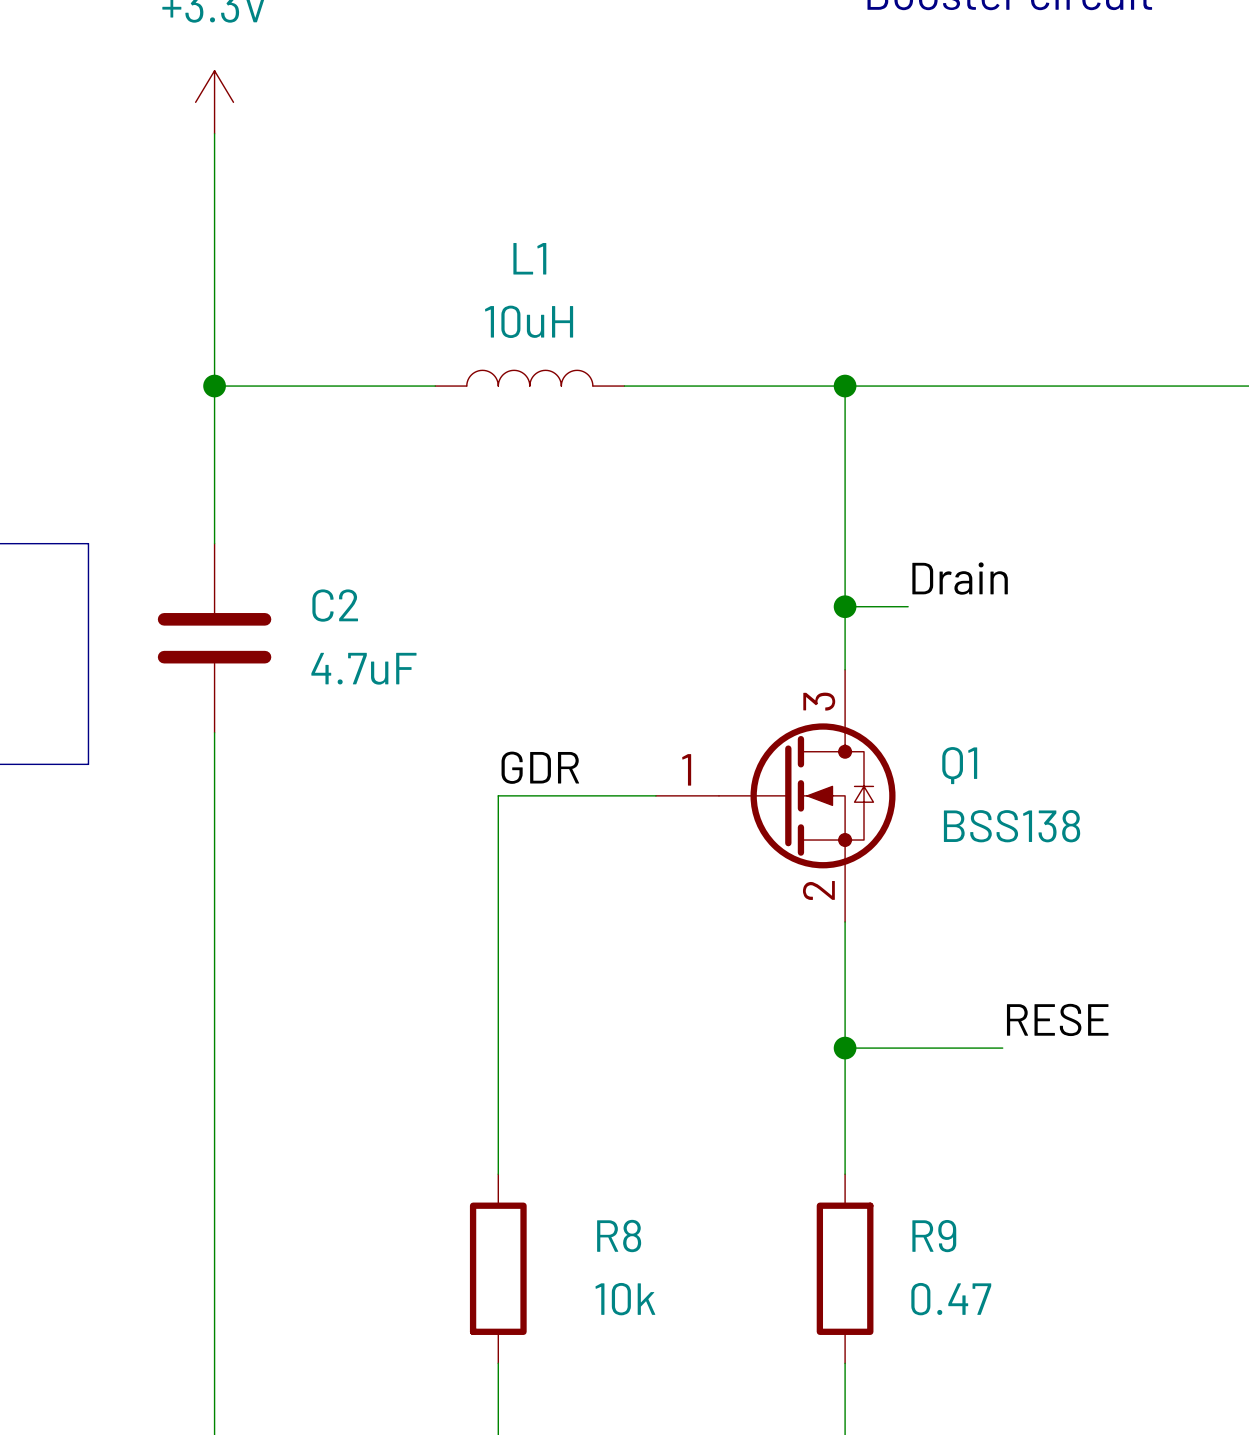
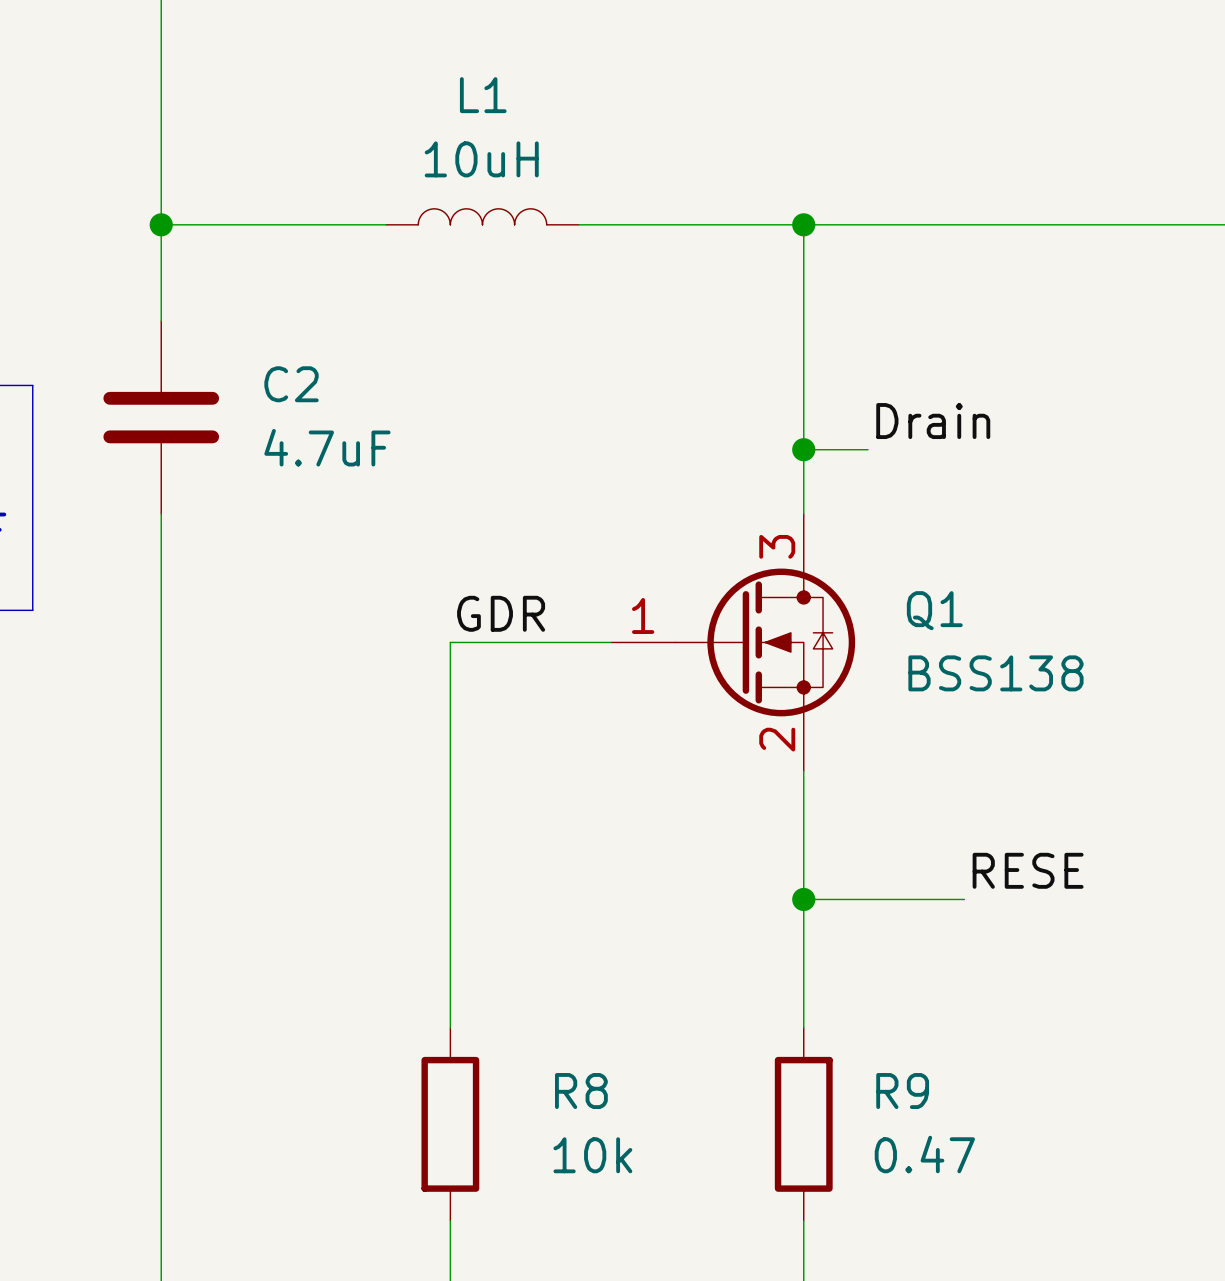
C2 position: (214, 638) -> (161, 417)

